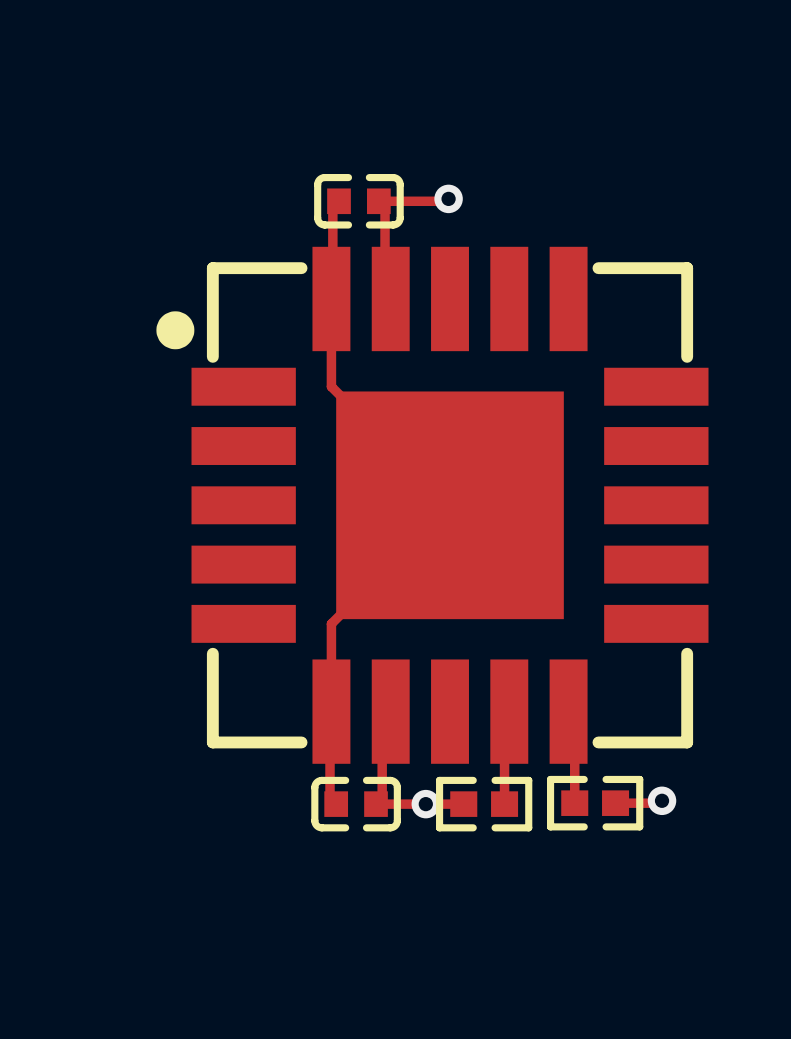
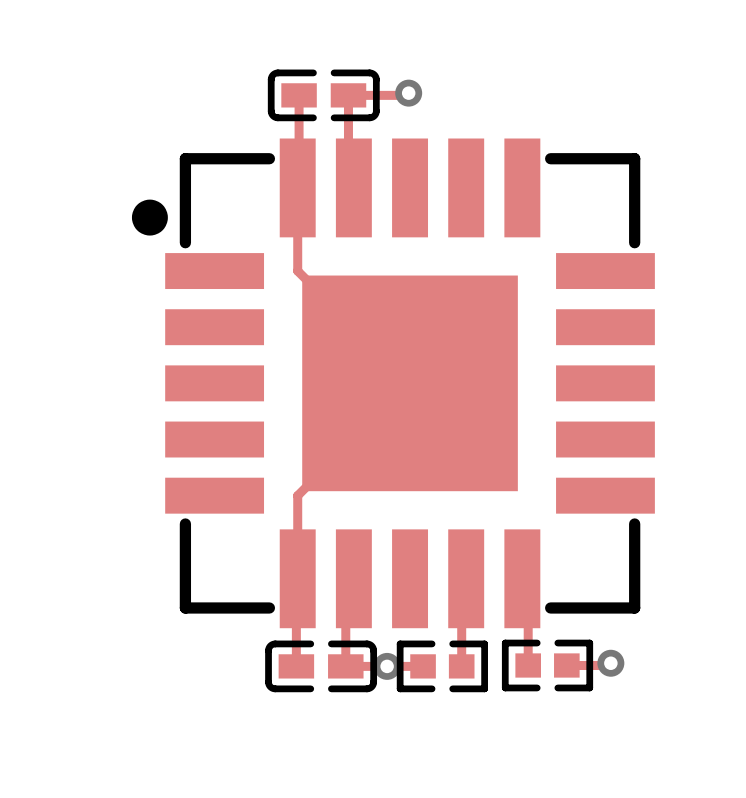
part footprint: [314, 174, 404, 229] -> [267, 69, 380, 122]
part footprint: [311, 776, 401, 832] -> [265, 640, 378, 693]

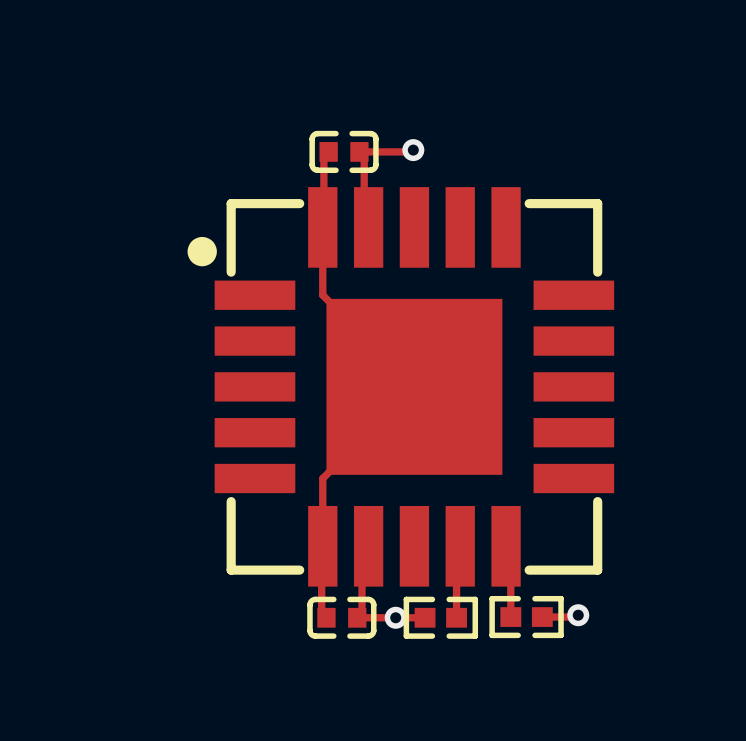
part footprint: [267, 69, 380, 122] -> [309, 130, 379, 174]
part footprint: [265, 640, 378, 693] -> [307, 596, 377, 639]

